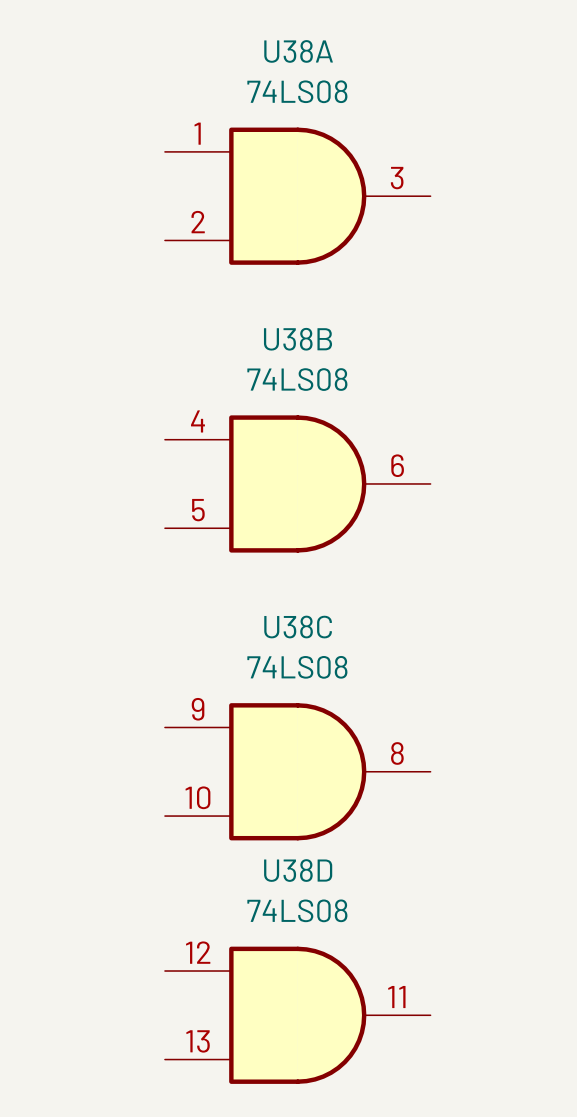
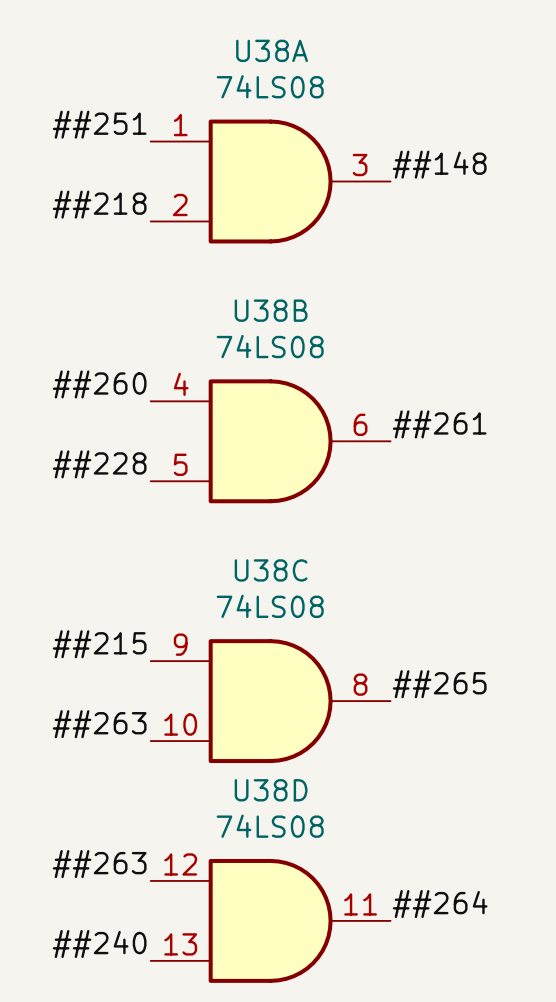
label: none -> ##251 (99, 124)
label: none -> ##148 (439, 164)
label: none -> ##218 (99, 204)
label: none -> ##260 (99, 384)
label: none -> ##261 (439, 424)
label: none -> ##228 (99, 464)
label: none -> ##215 (99, 644)
label: none -> ##265 (439, 684)
label: none -> ##263 (99, 724)
label: none -> ##263 (99, 864)
label: none -> ##264 (440, 904)
label: none -> ##240 (99, 944)

